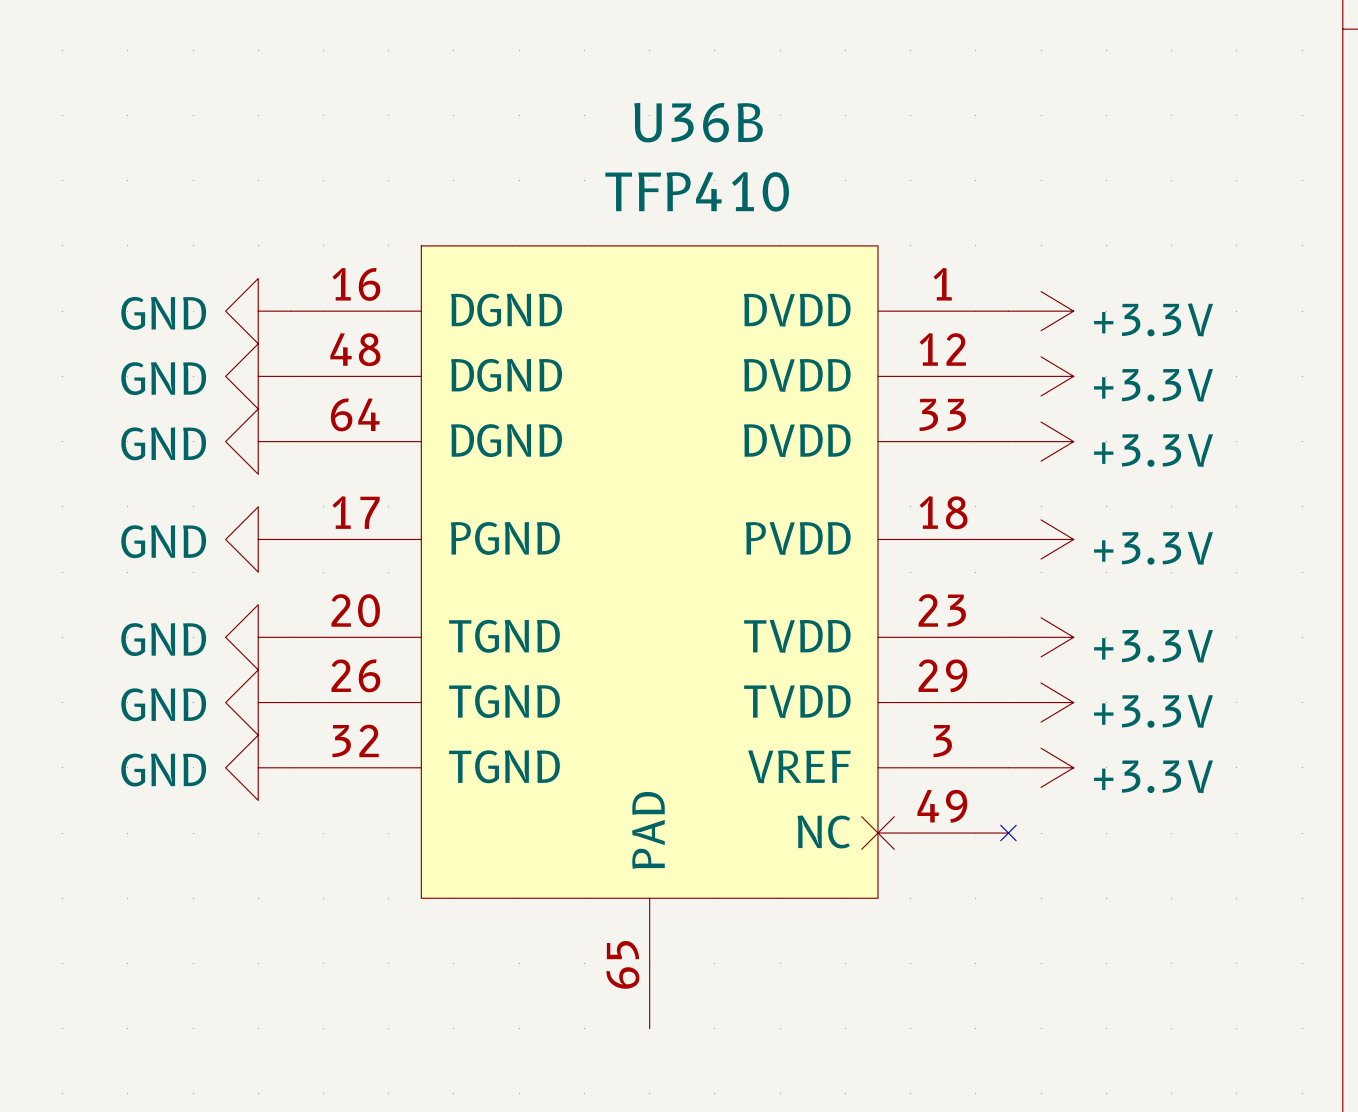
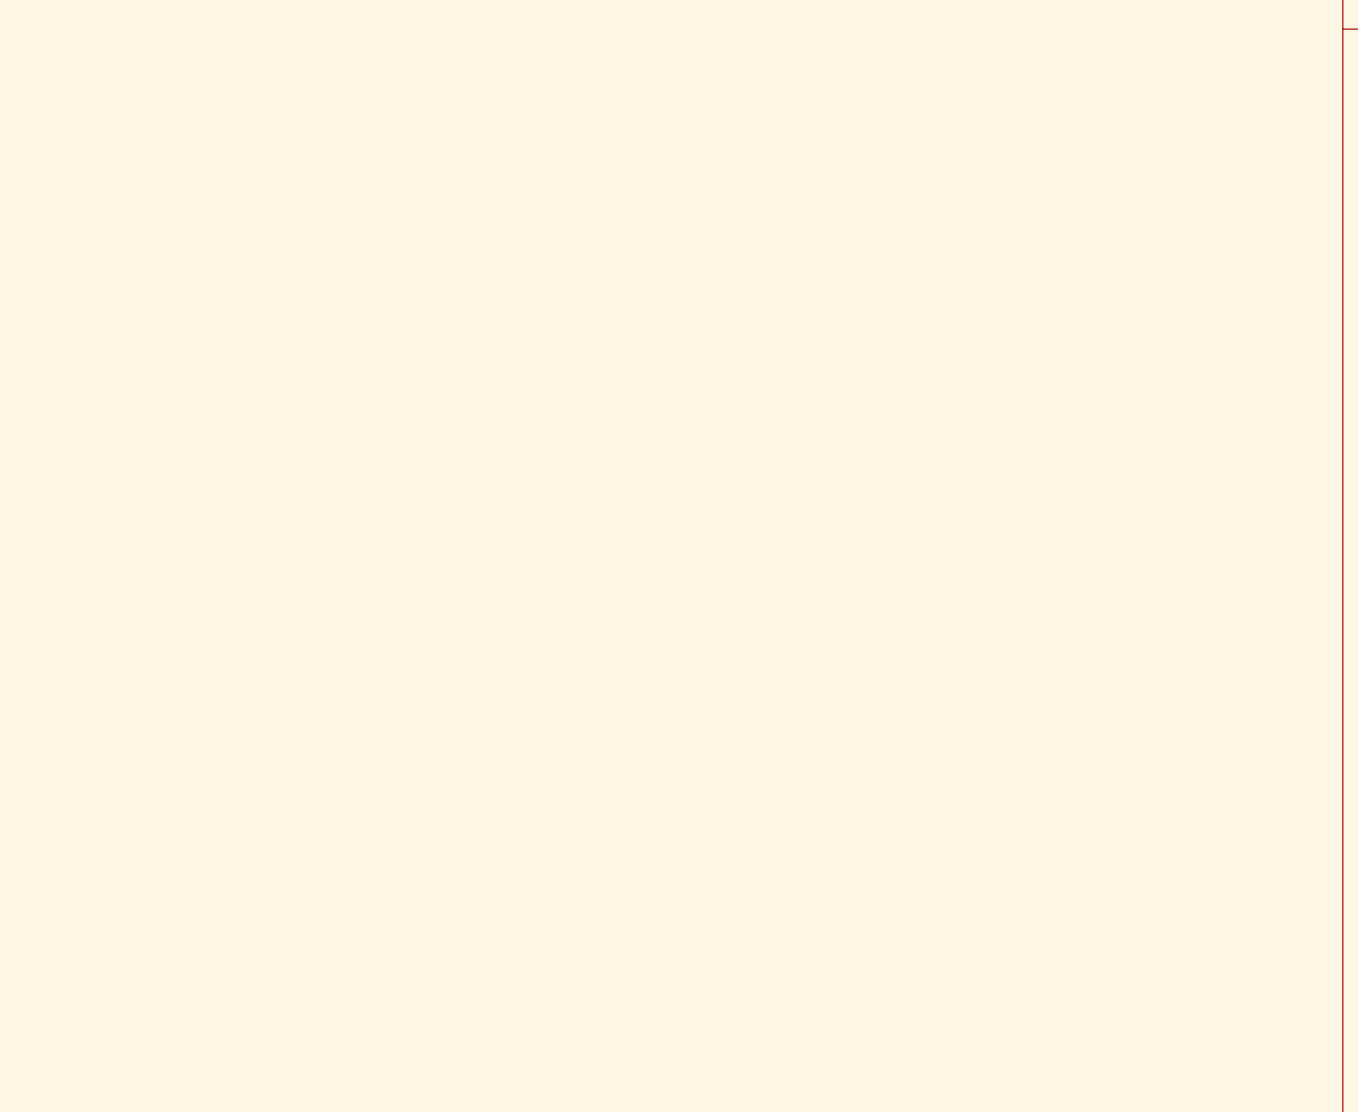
power symbol: GND (258, 311) -> none
power symbol: +3.3V (1041, 311) -> none
power symbol: GND (258, 376) -> none
power symbol: +3.3V (1041, 376) -> none
power symbol: GND (258, 441) -> none
power symbol: +3.3V (1041, 441) -> none
power symbol: GND (258, 539) -> none
power symbol: +3.3V (1041, 539) -> none
power symbol: GND (258, 637) -> none
U36B: TFP410 (653, 637) -> none
power symbol: +3.3V (1041, 637) -> none
power symbol: GND (258, 702) -> none
power symbol: +3.3V (1041, 702) -> none
power symbol: GND (258, 767) -> none
power symbol: +3.3V (1041, 767) -> none

